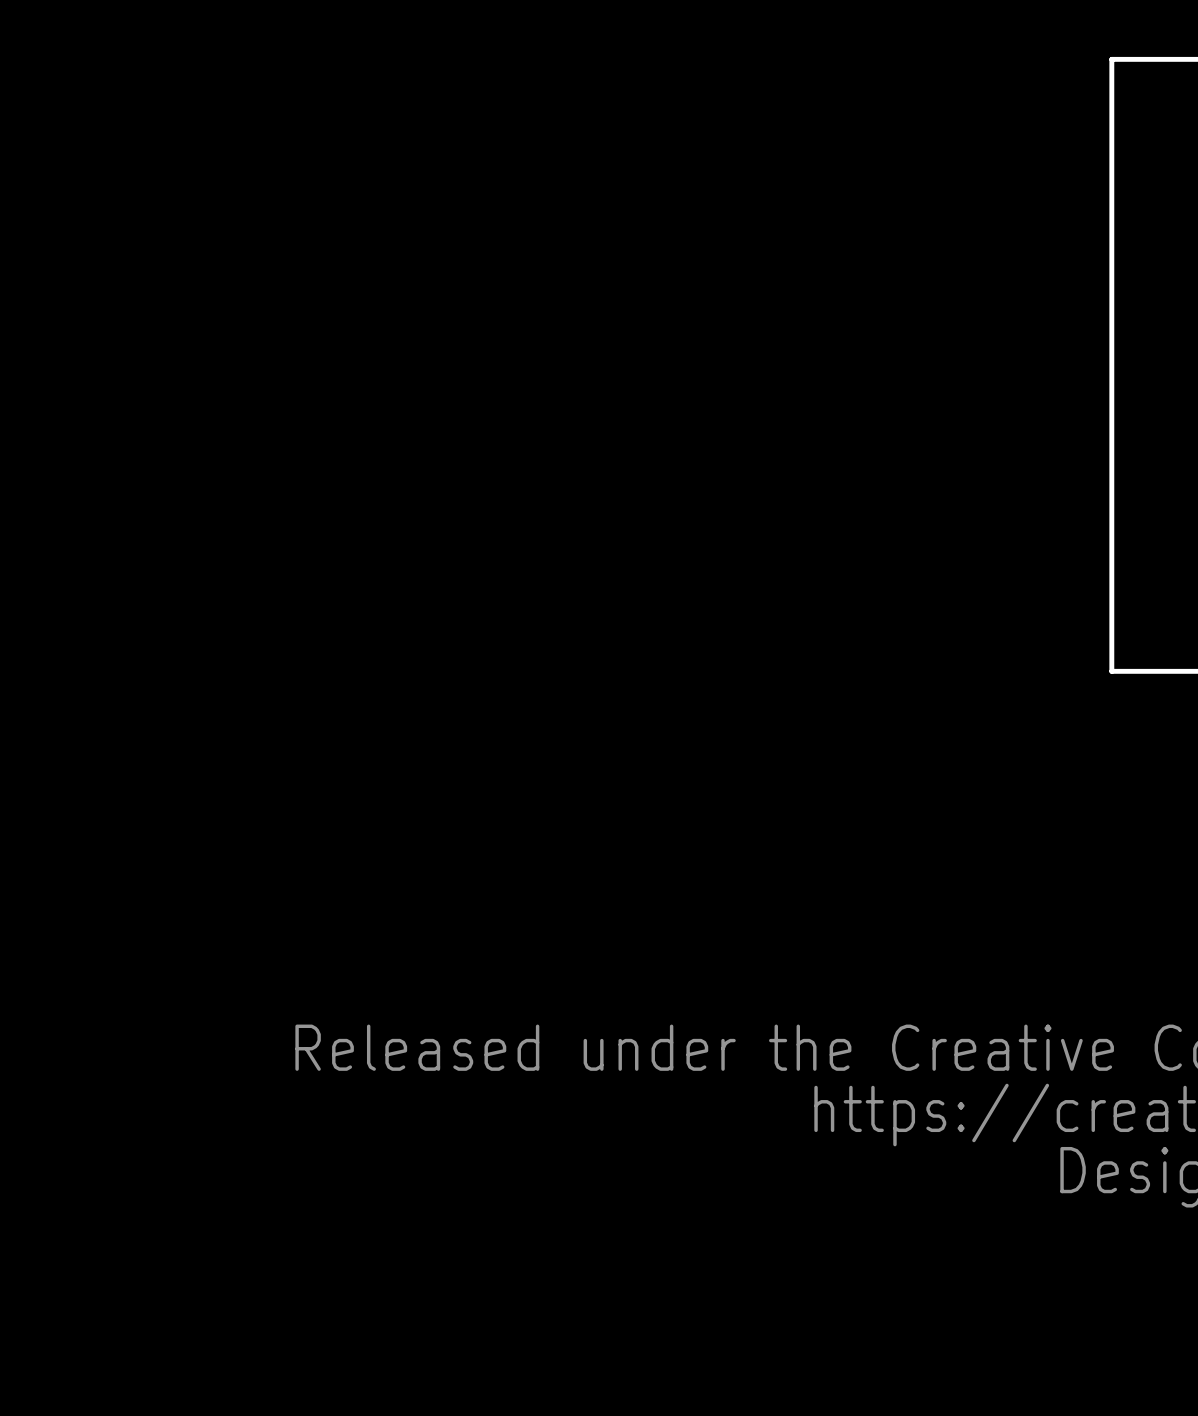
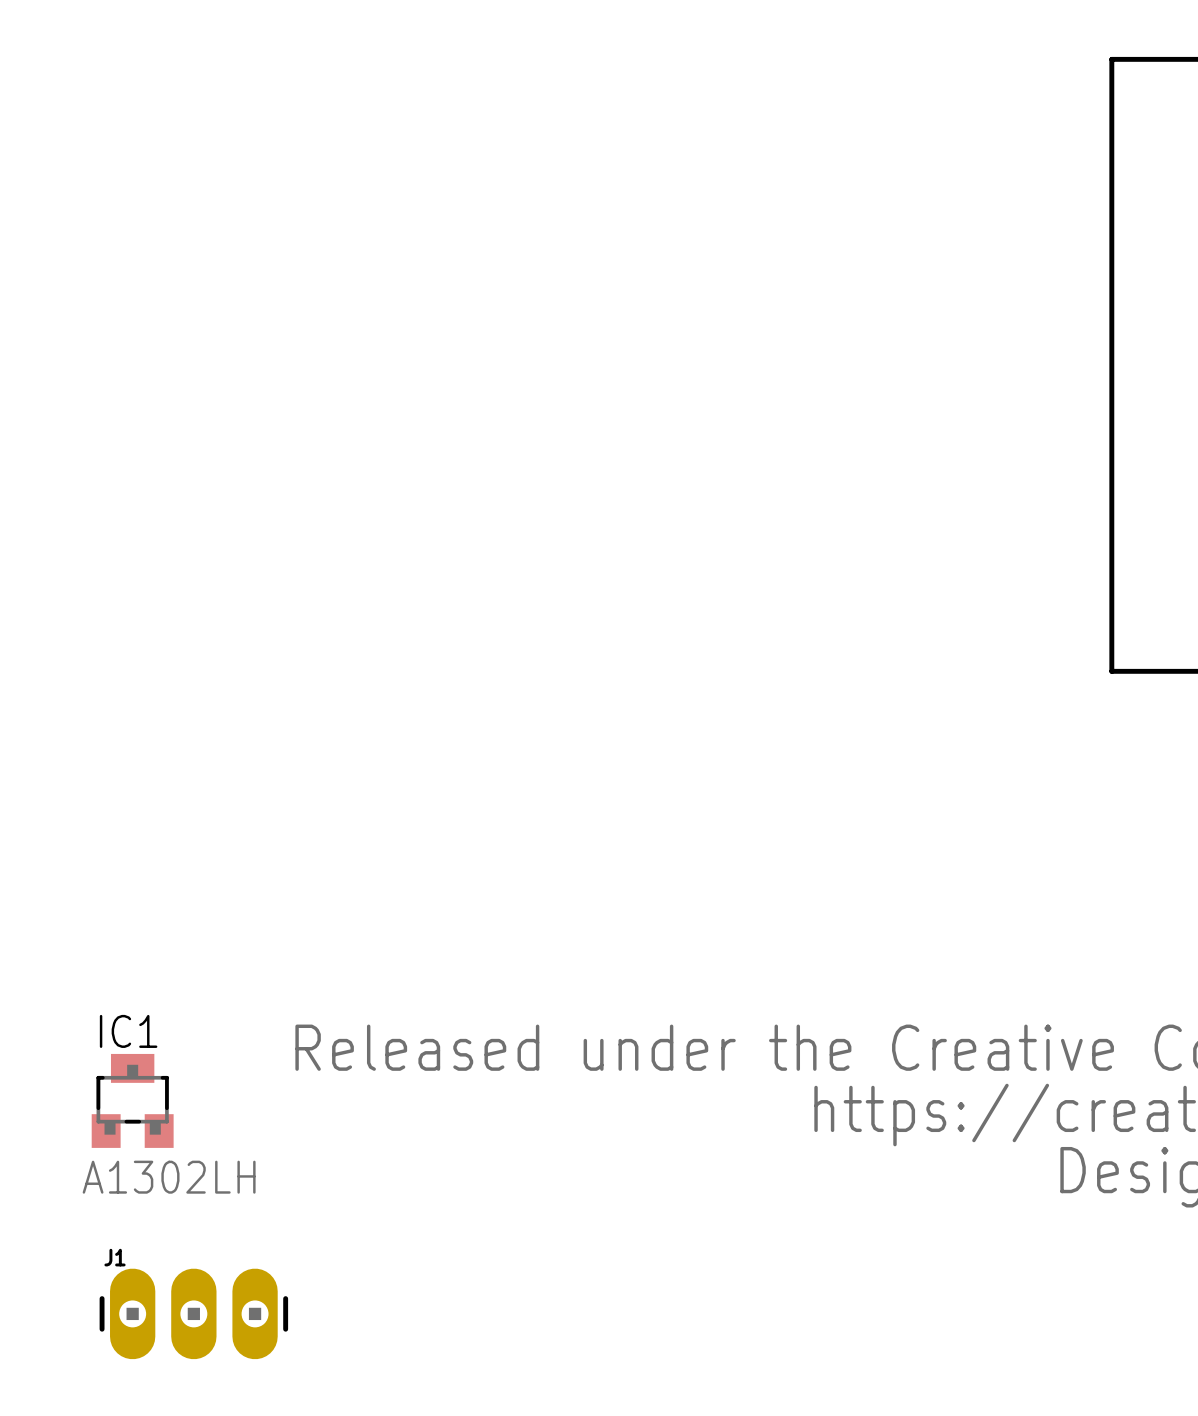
IC1: none -> A1302LH (132, 1100)
J1: none -> (193, 1313)

